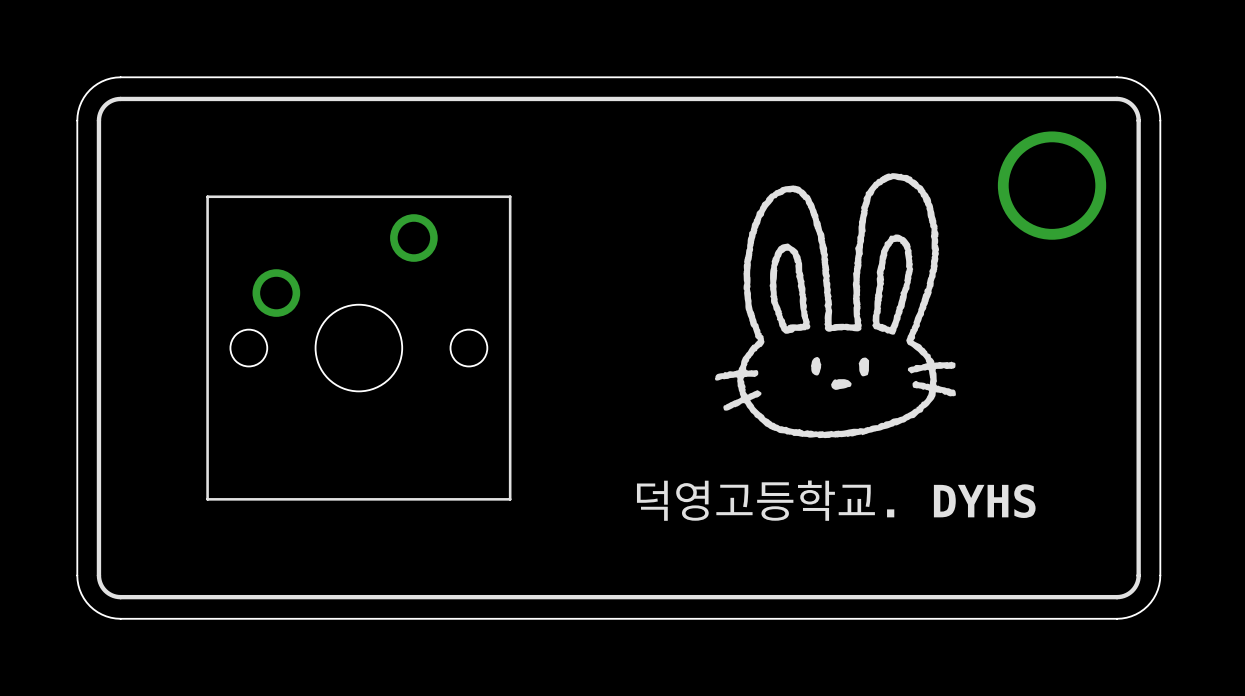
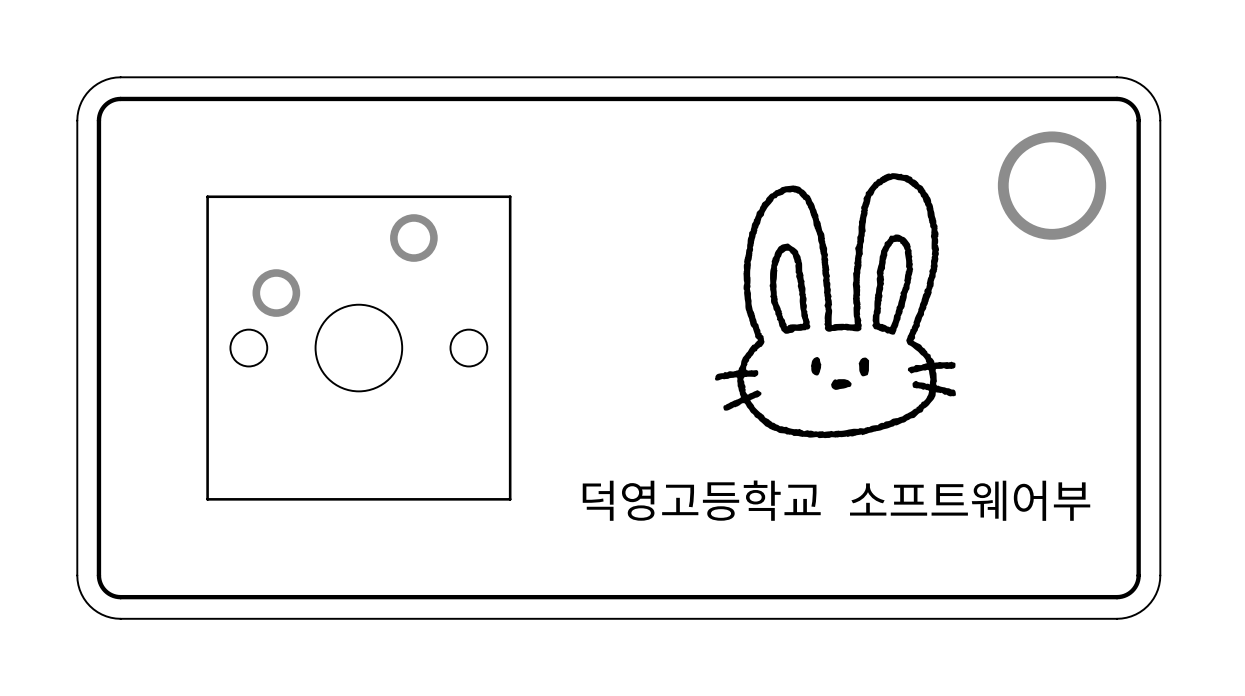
text: 덕영고등학교. DYHS (836, 500) -> 덕영고등학교 소프트웨어부 (836, 500)

